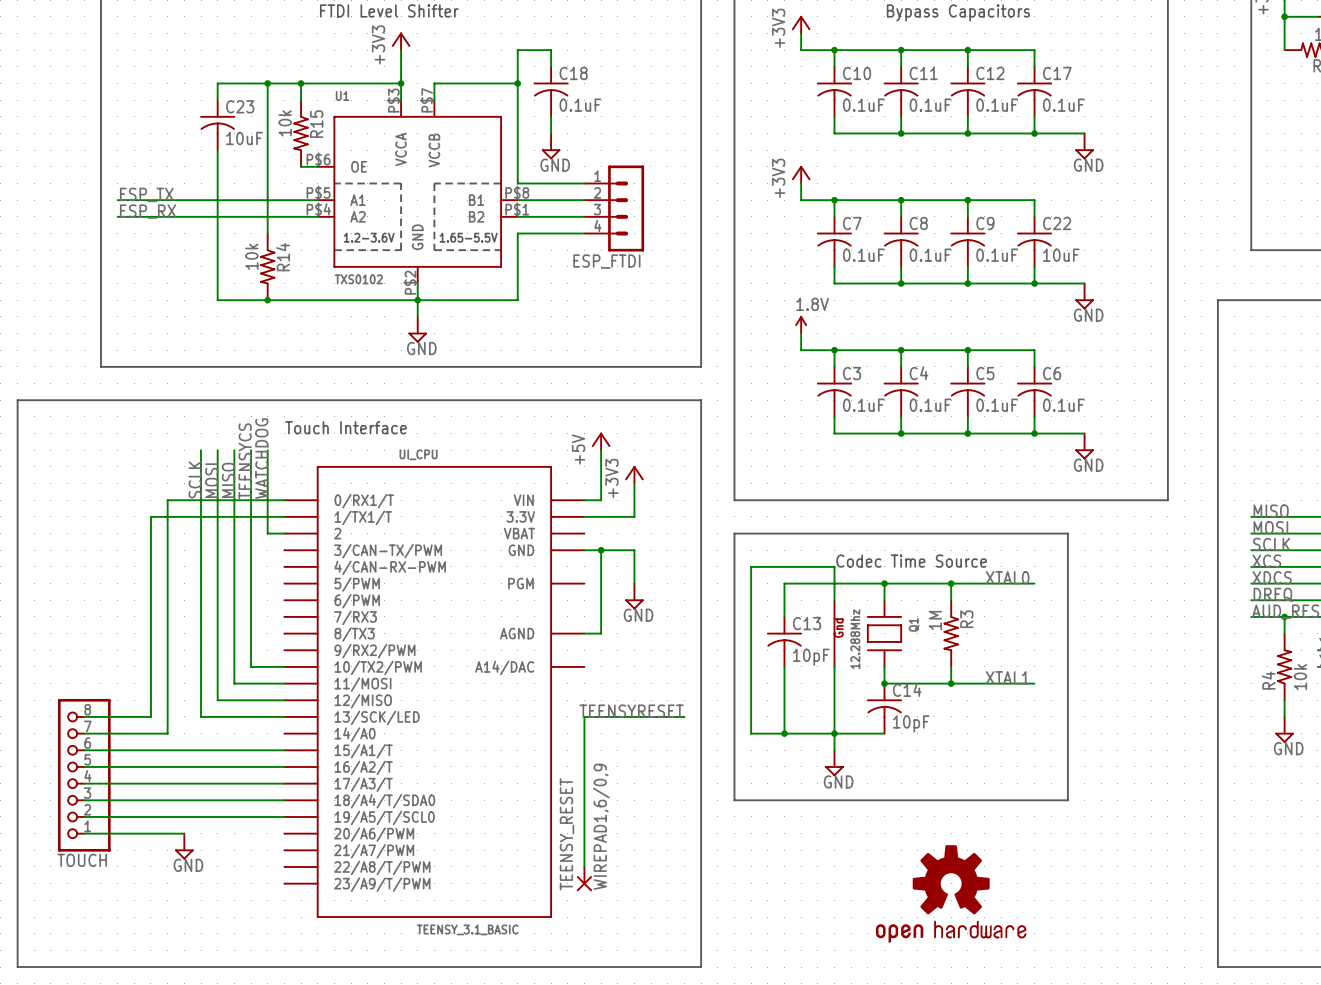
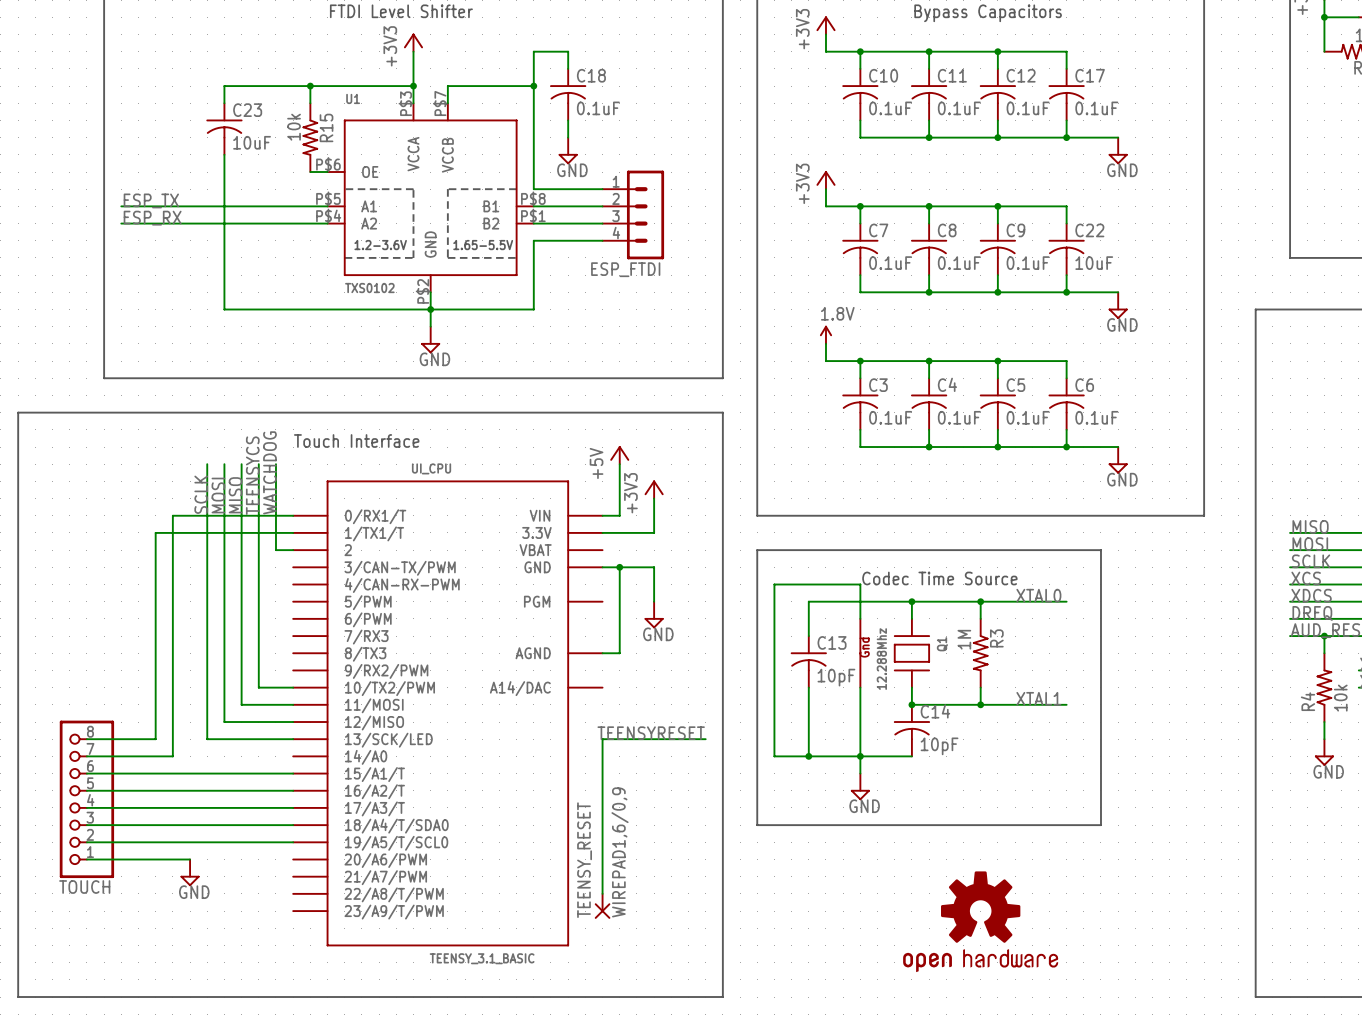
wire: (267, 83) (267, 233) -> none
junction: (267, 83) -> none
R14: 10k (267, 266) -> none
junction: (267, 300) -> none

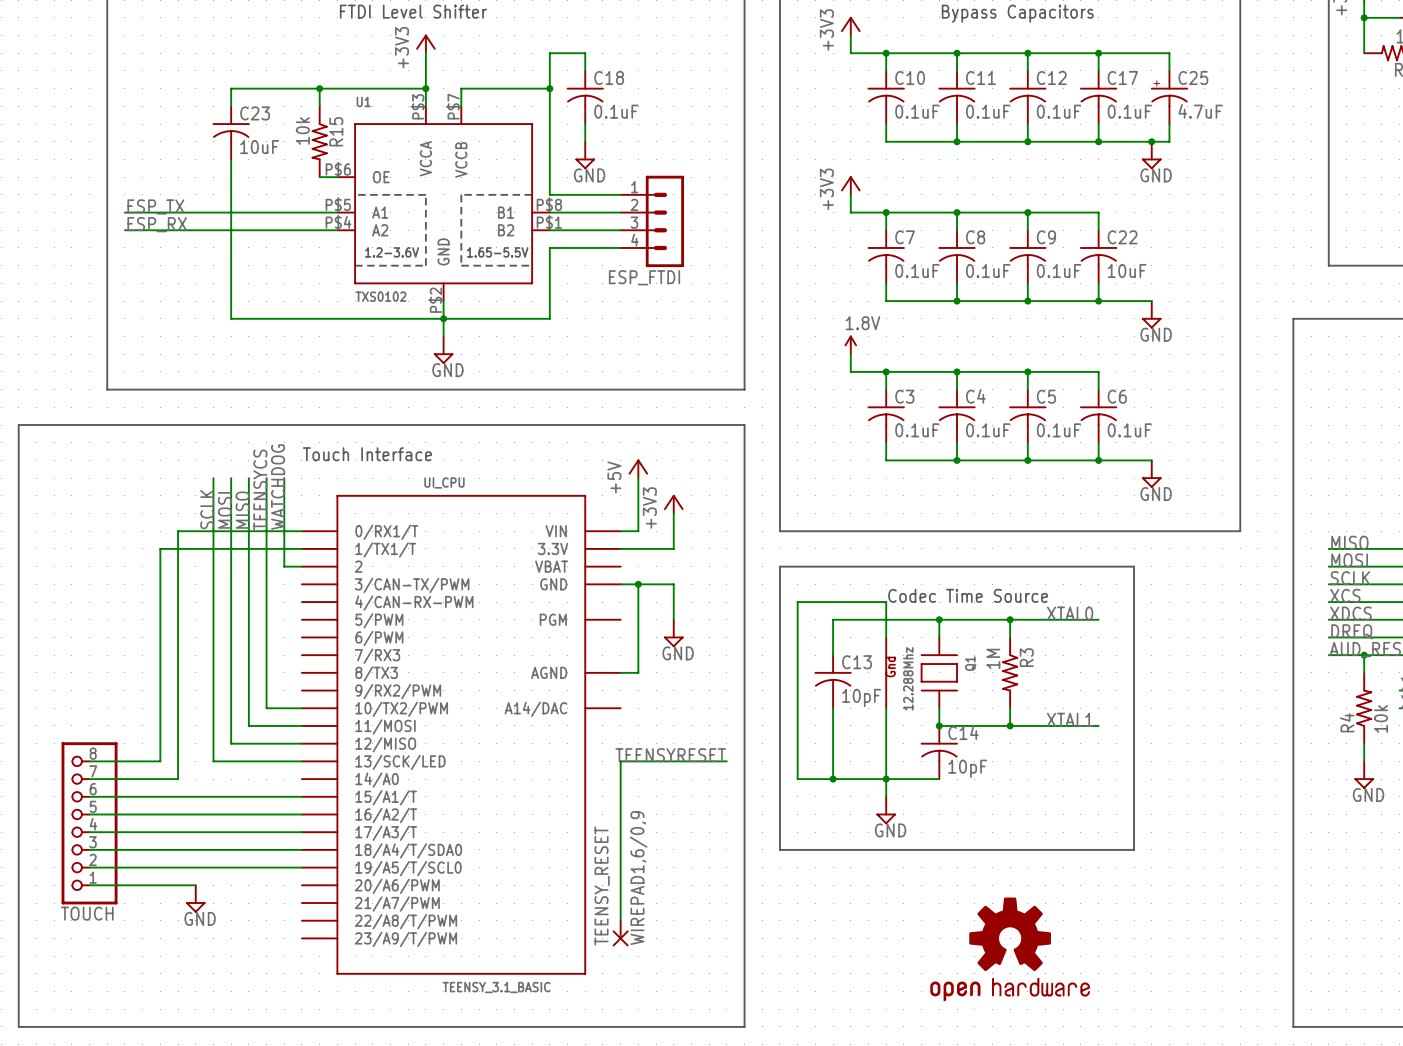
wire: none -> (1098, 53) (1169, 53) (1169, 70)
junction: none -> (1098, 53)
C25: none -> 4.7uF (1169, 97)
wire: none -> (1169, 124) (1169, 141) (1151, 141)
junction: none -> (1151, 141)

